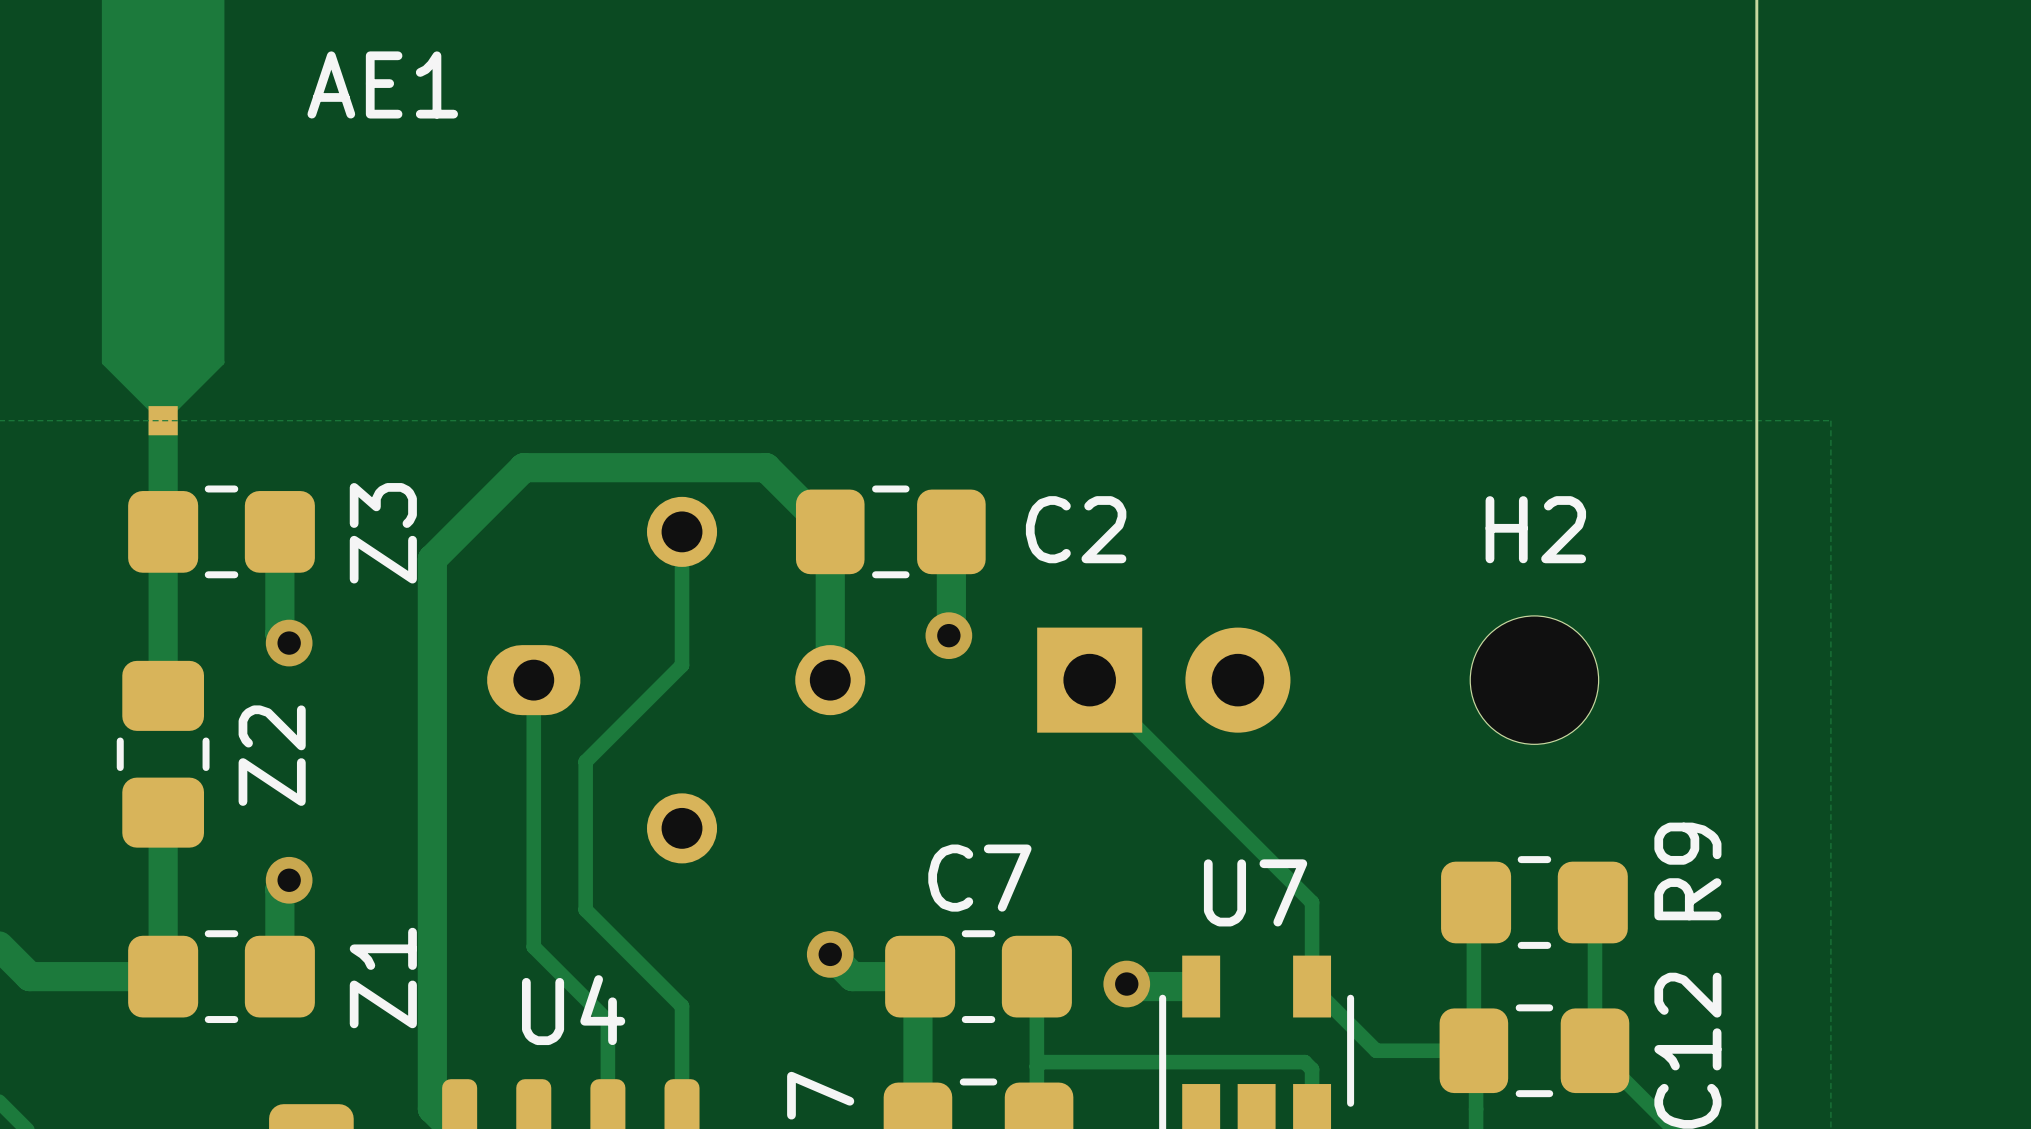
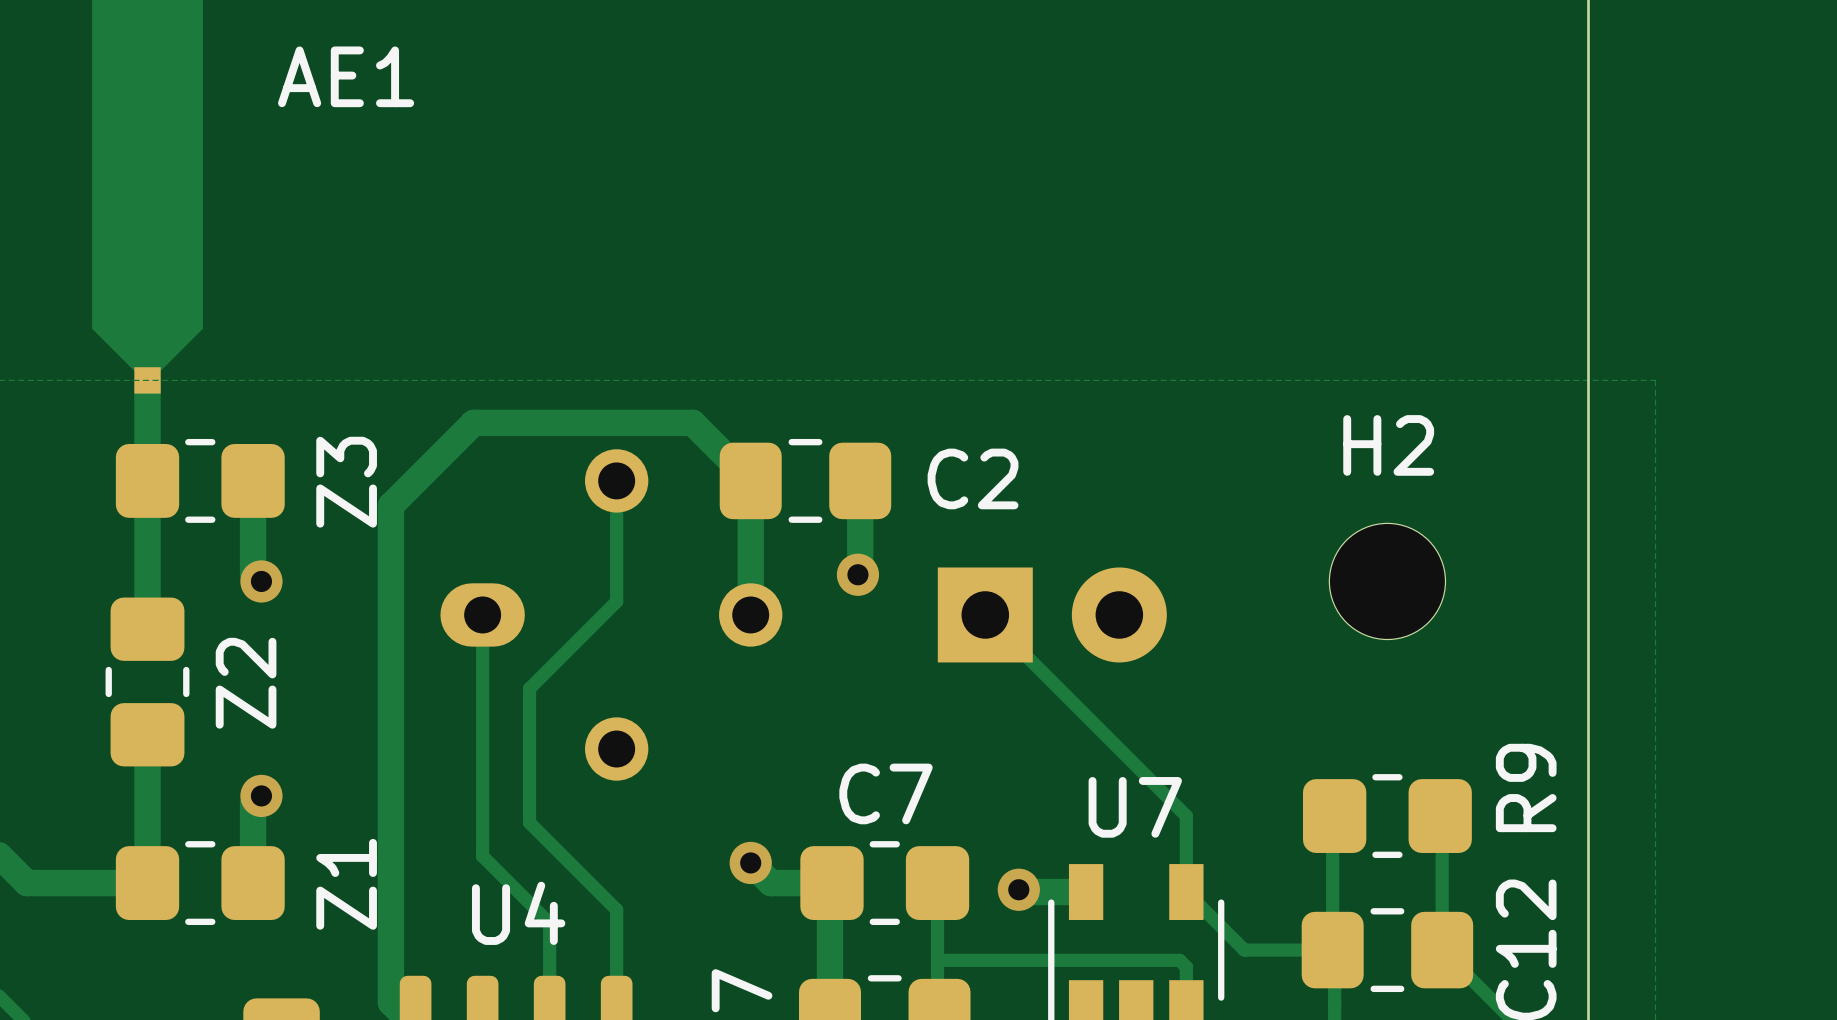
H2 position: (1534, 680) -> (1387, 581)

